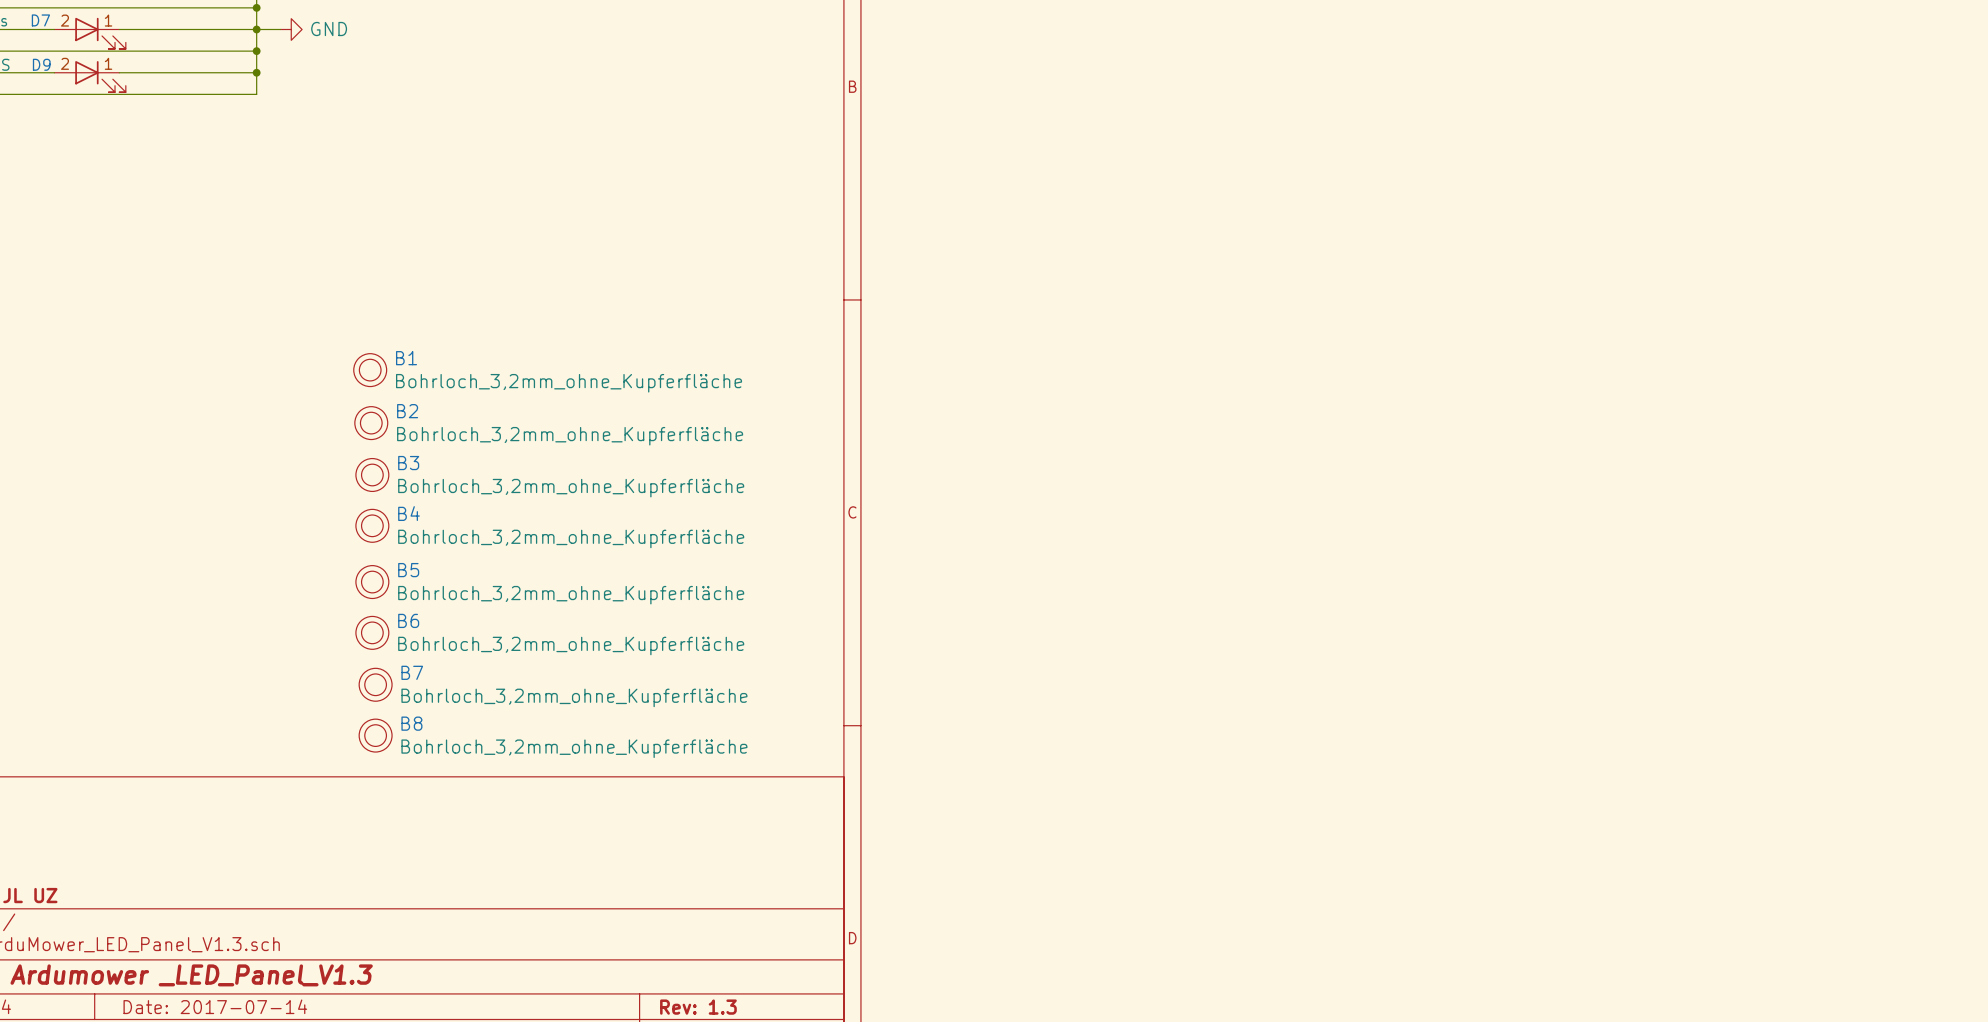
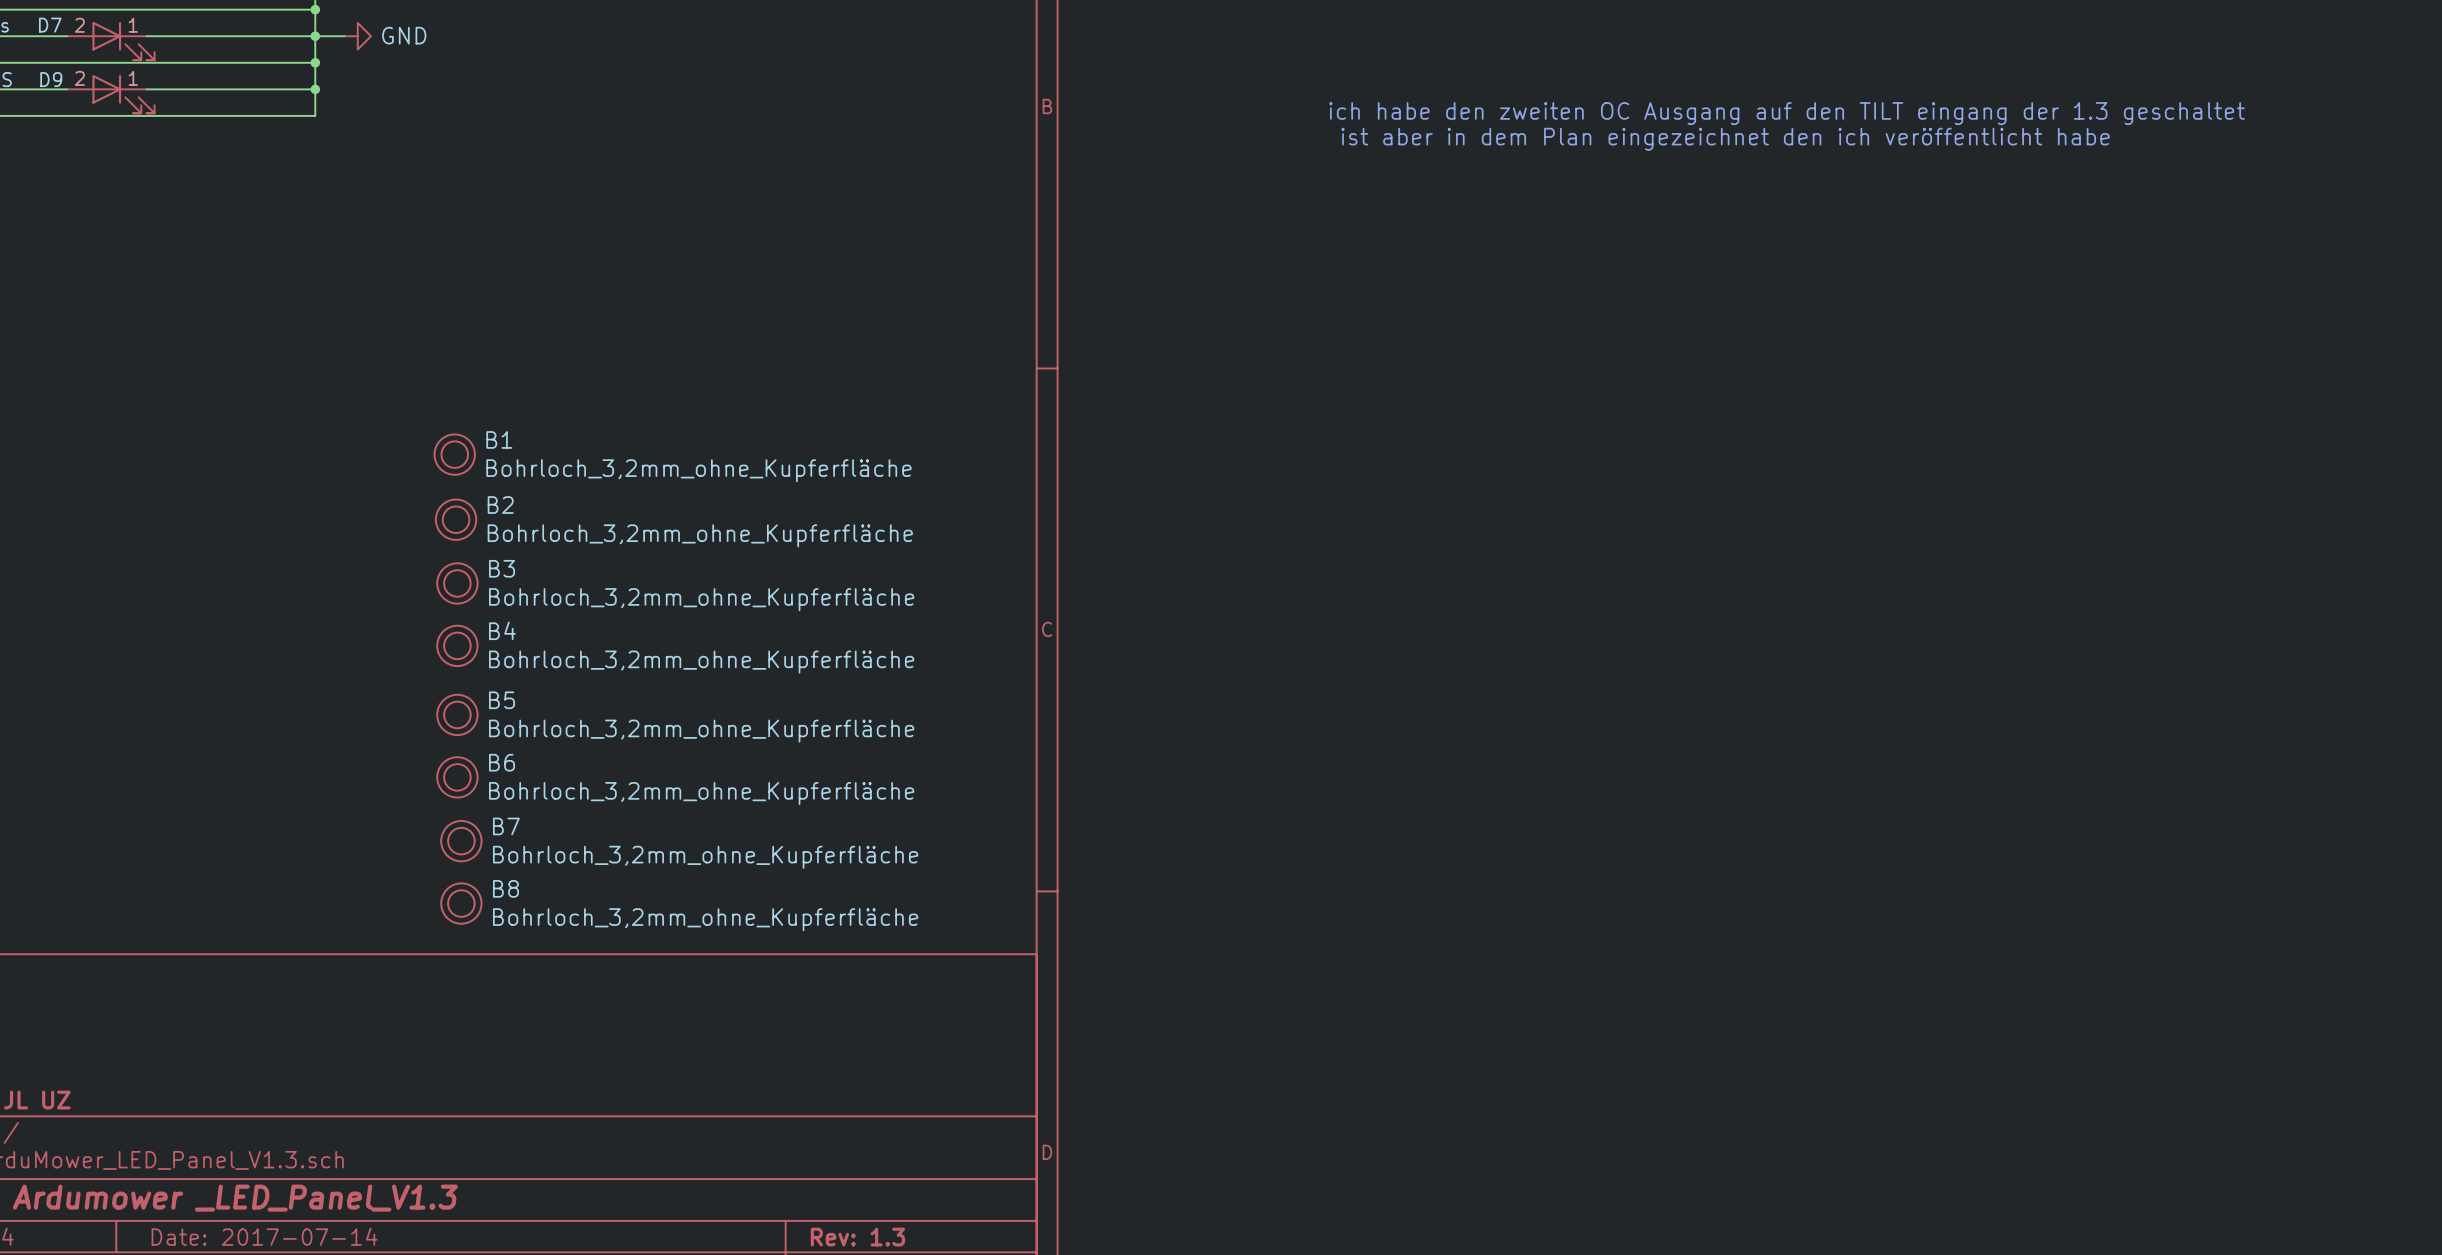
text: none -> ich habe den zweiten OC Ausgang auf den TILT eingang der 1.3 geschaltet (1787, 113)
text: none -> ist aber in dem Plan eingezeichnet den ich veröffentlicht habe (1725, 139)

